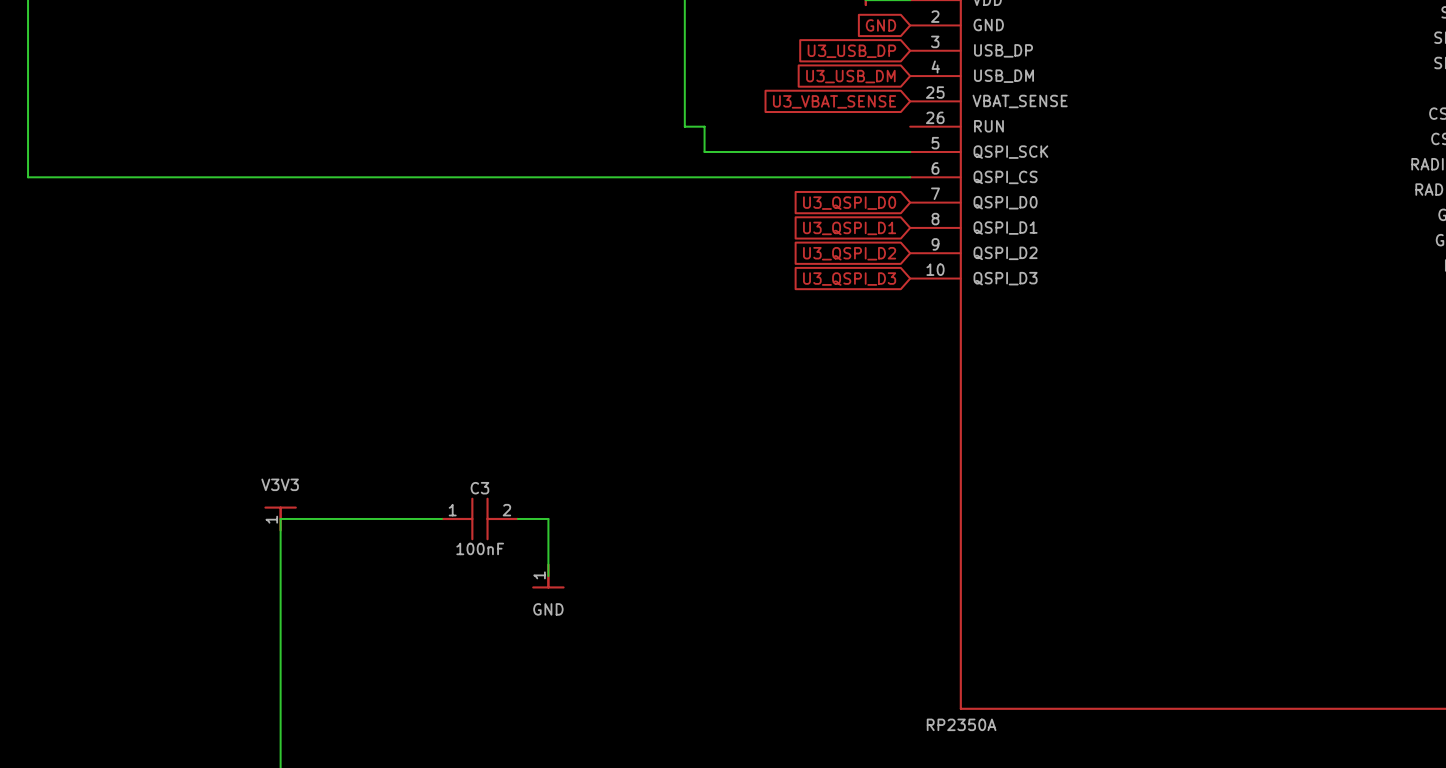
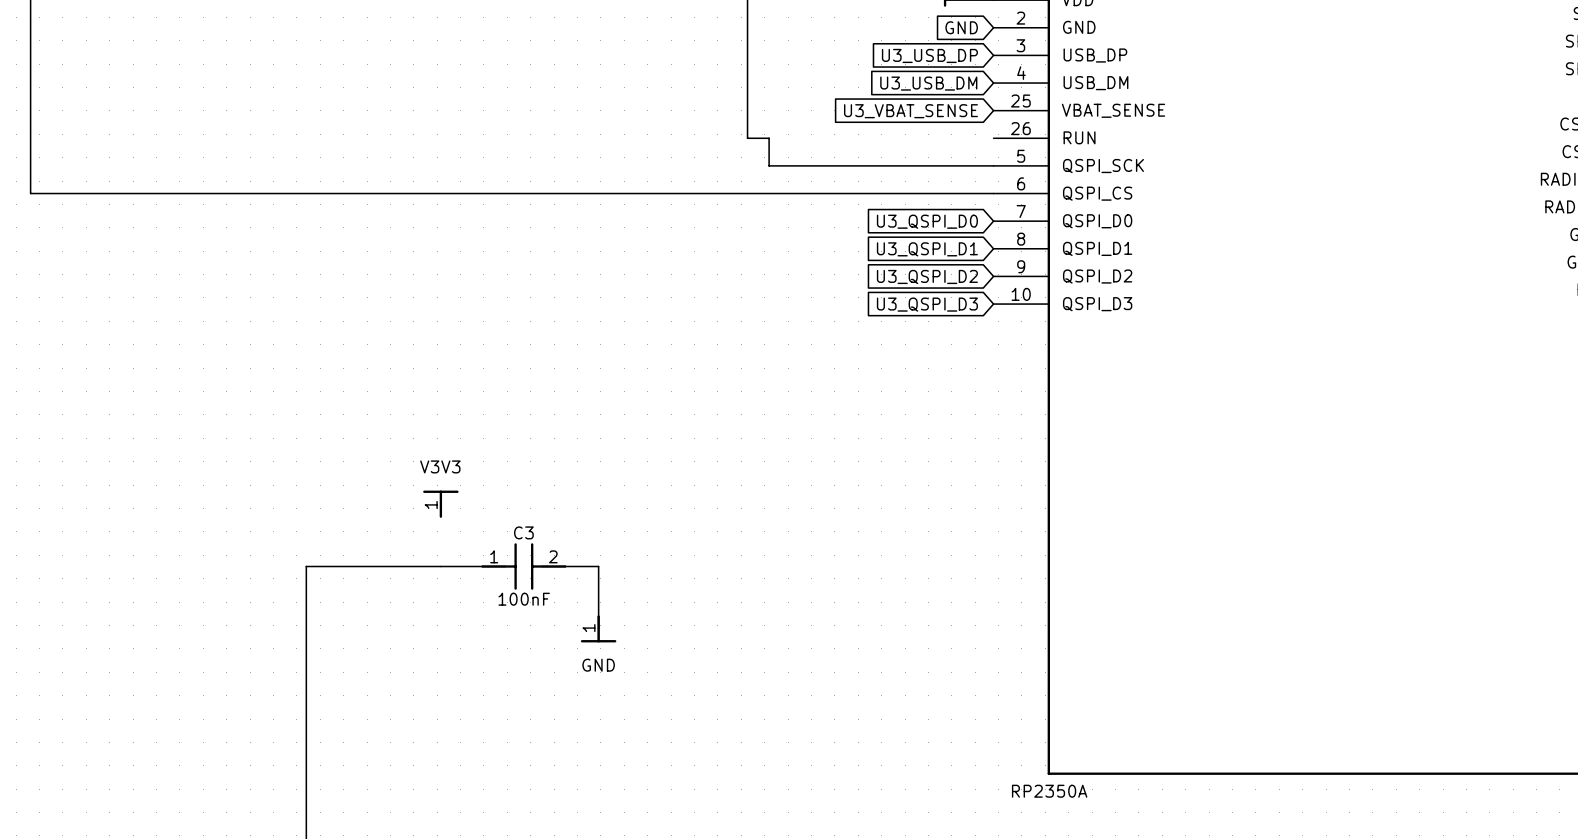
V3V3 position: (280, 518) -> (440, 504)

